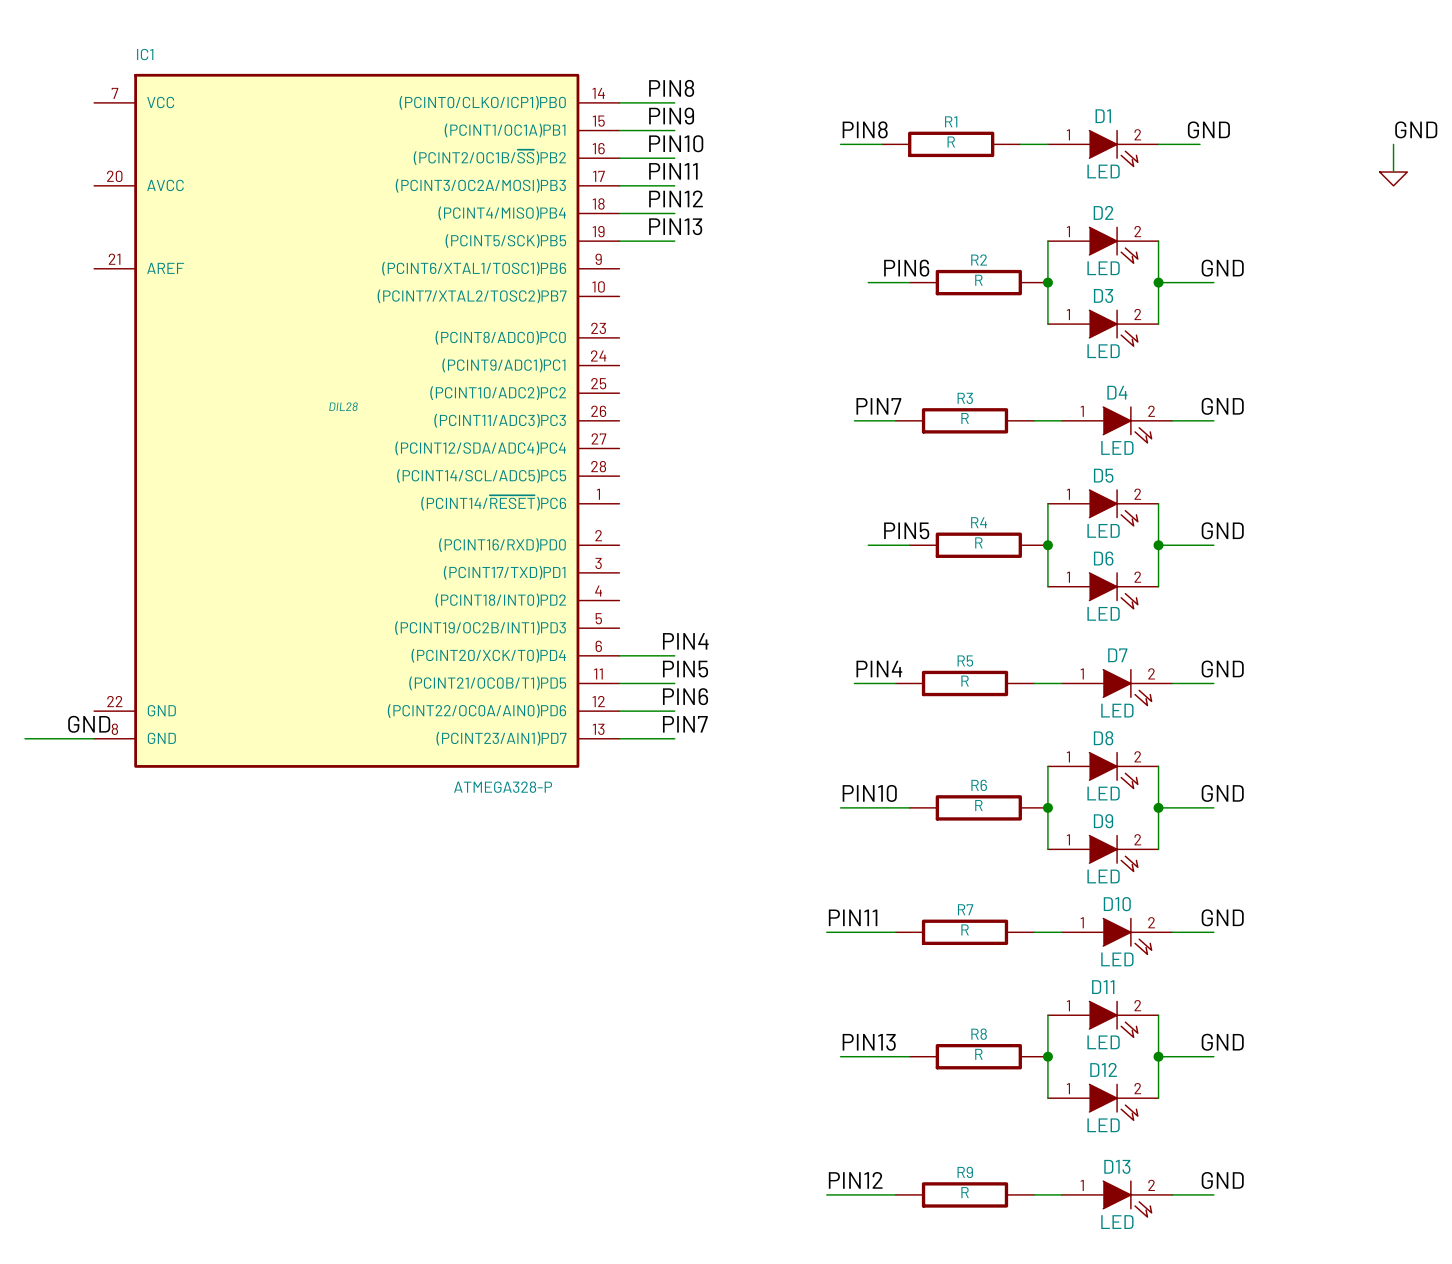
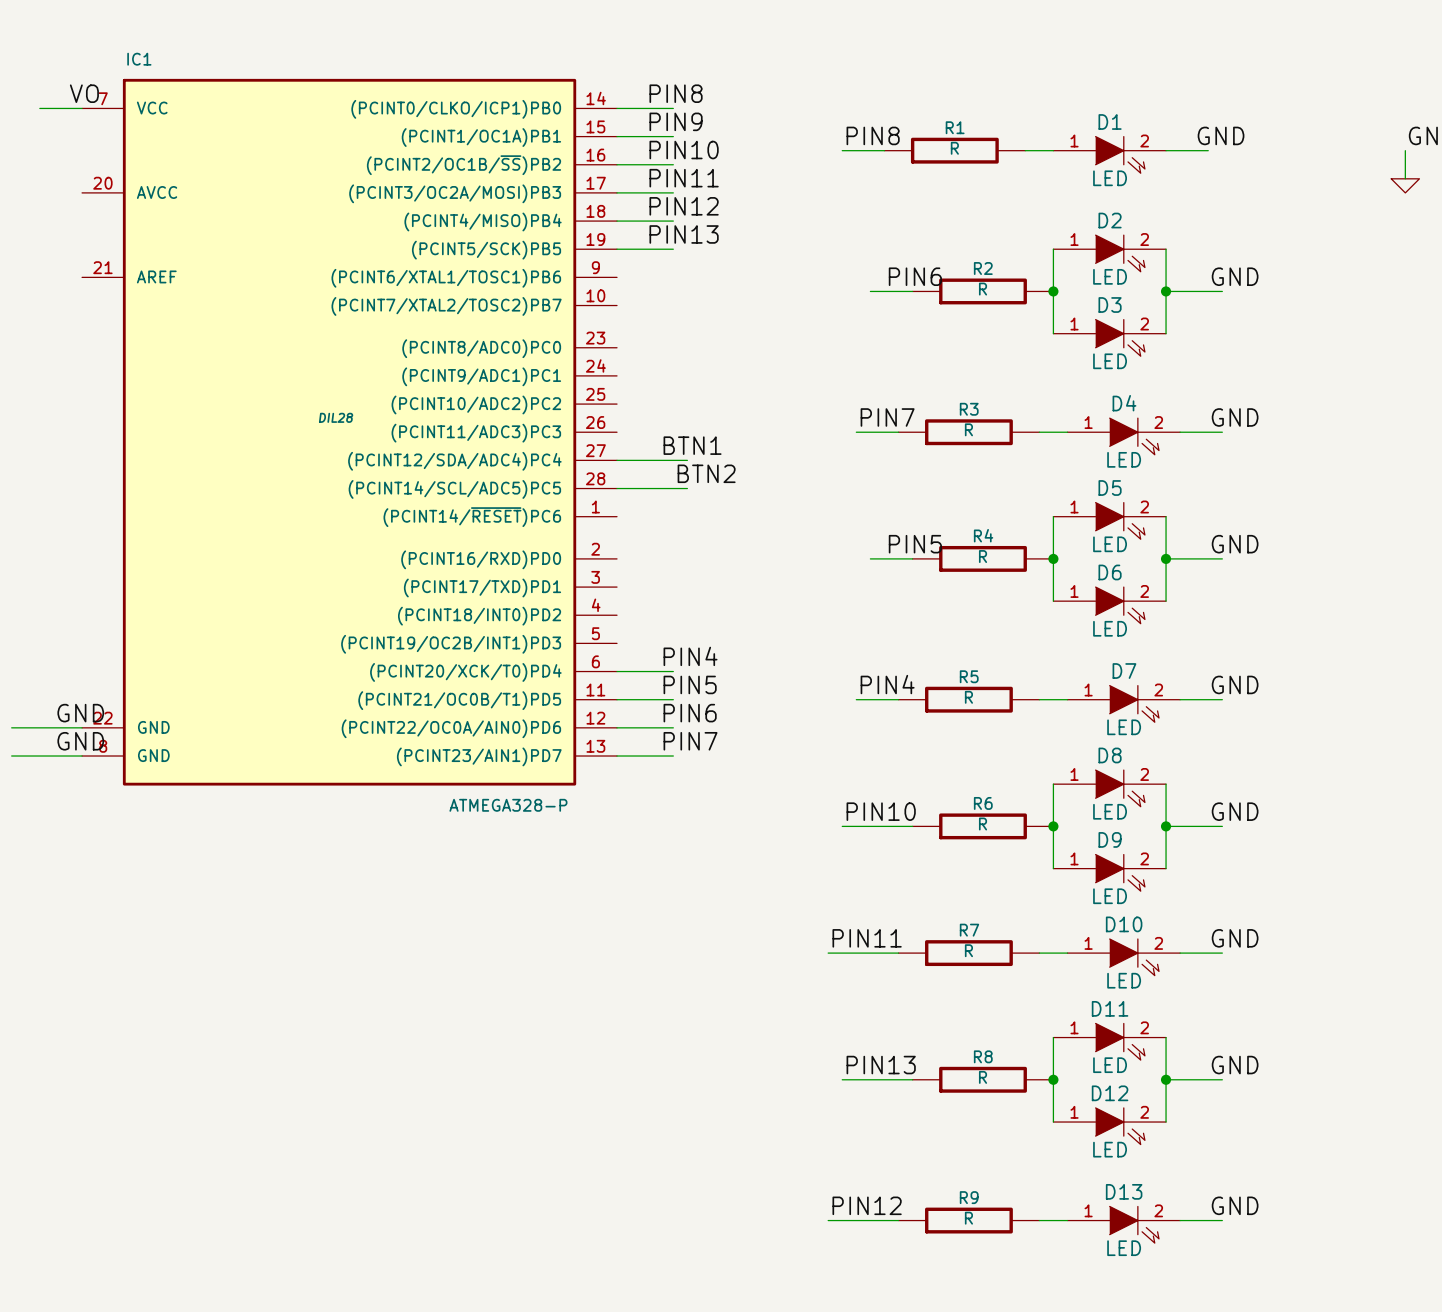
label: none -> VO (84, 93)
wire: none -> (39, 108) (82, 108)
label: none -> BTN1 (692, 445)
wire: none -> (617, 460) (687, 460)
label: none -> BTN2 (706, 473)
wire: none -> (617, 488) (687, 488)
label: none -> GND (80, 713)
wire: none -> (11, 727) (82, 727)

